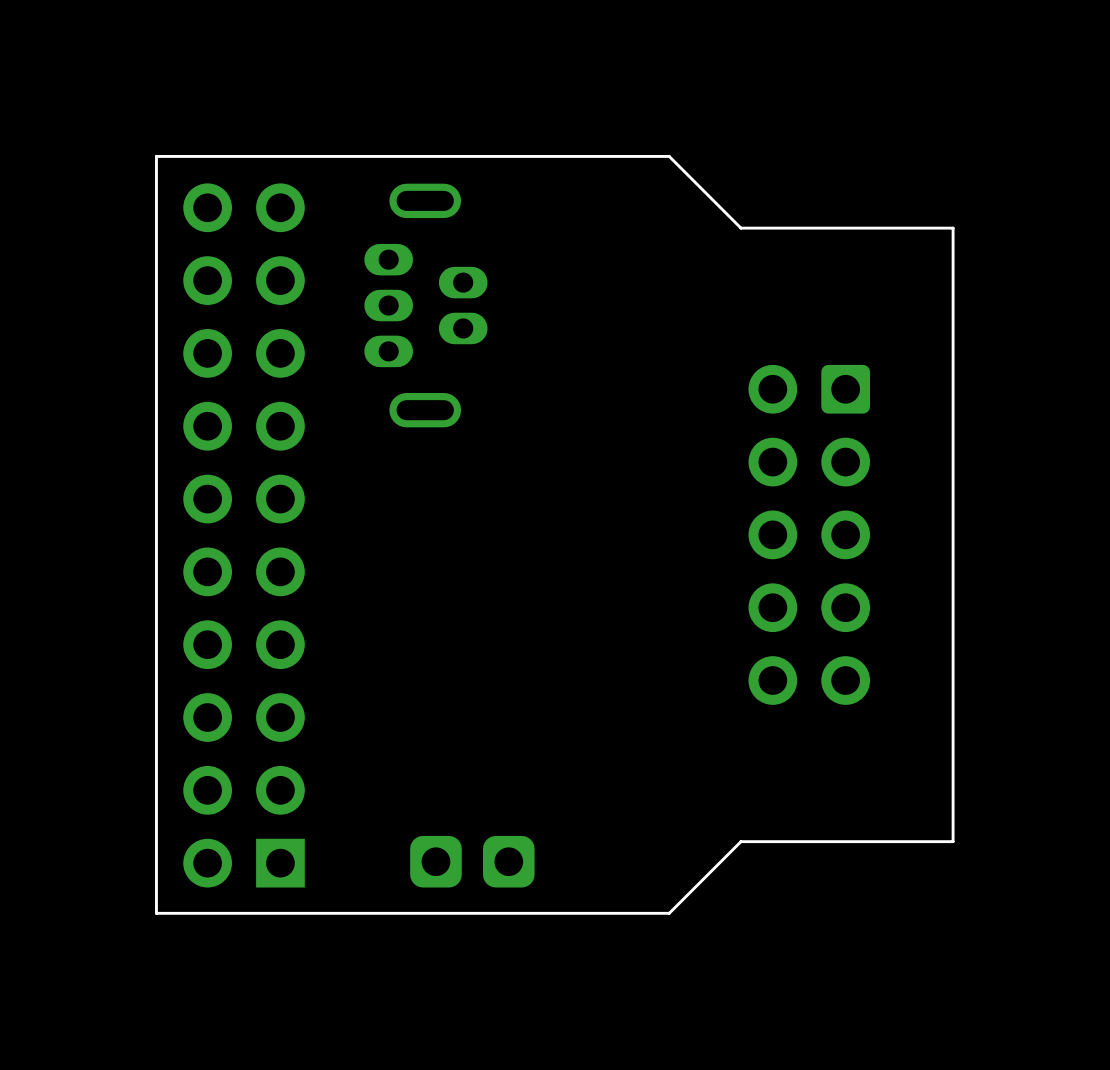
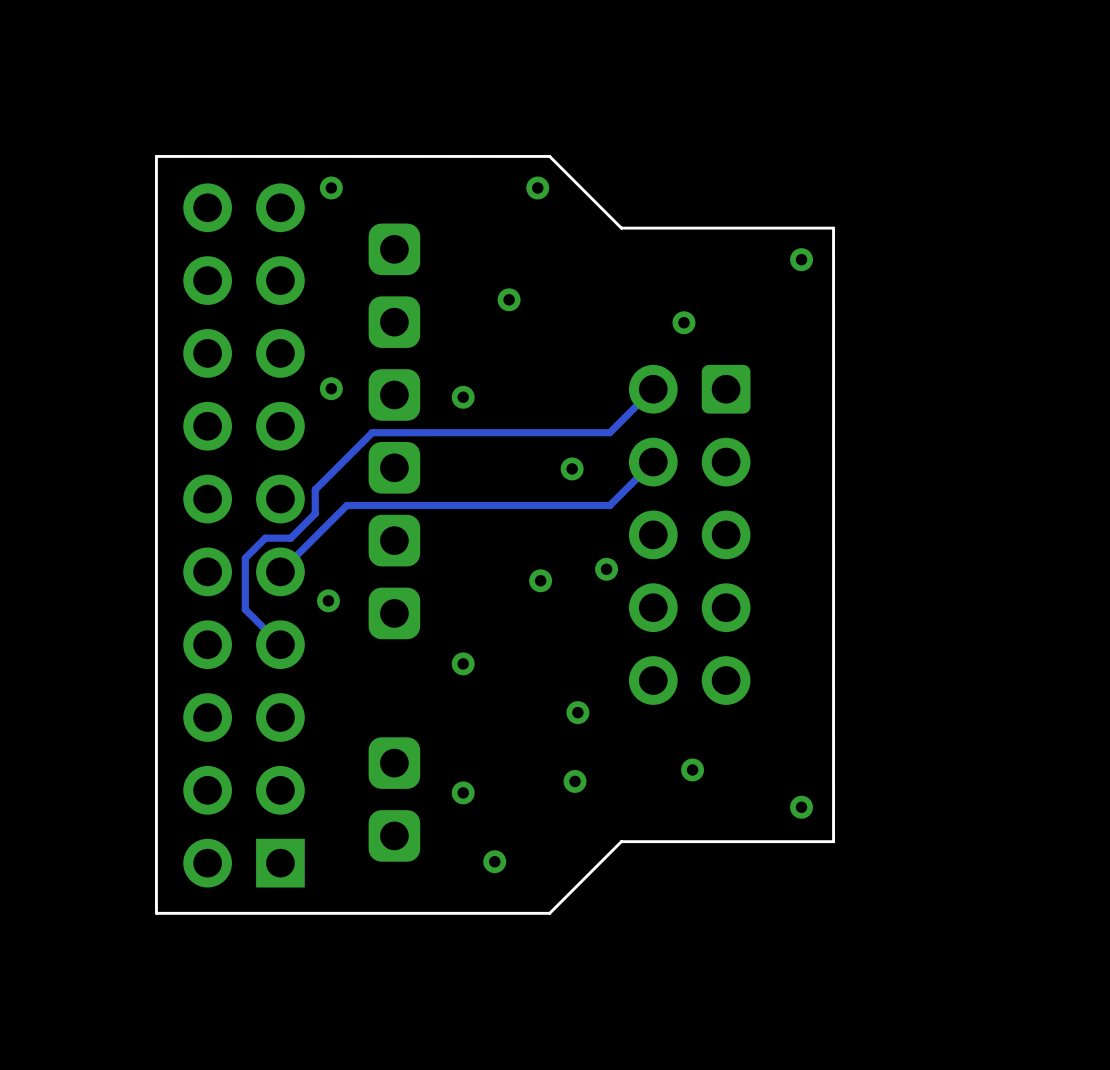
board edge: (549, 156) (669, 156) (740, 228) -> (549, 156) (621, 228) (740, 228)
via: none -> (331, 187)
via: none -> (537, 187)
board edge: (833, 228) (953, 228) (953, 841) (833, 841) -> (833, 228) (833, 841)
via: none -> (801, 259)
via: none -> (509, 299)
part: (425, 305) -> none
via: none -> (683, 322)
via: none -> (331, 388)
track: none -> (653, 389) (609, 432) (372, 432) (315, 489) (315, 513) (290, 538) (265, 538) (245, 558) (245, 609) (280, 644)
via: none -> (463, 397)
part: none -> (394, 431)
track: none -> (653, 462) (609, 505) (346, 505) (280, 571)
via: none -> (572, 468)
part position: (809, 534) -> (689, 534)
via: none -> (606, 569)
via: none -> (540, 580)
via: none -> (328, 600)
via: none -> (463, 663)
via: none -> (577, 712)
via: none -> (692, 769)
via: none -> (575, 781)
via: none -> (463, 792)
via: none -> (801, 807)
board edge: (740, 841) (669, 913) (549, 913) -> (740, 841) (621, 841) (549, 913)
part rotation: 0° (472, 861) -> 90° clockwise (394, 799)
part position: (472, 861) -> (394, 799)
via: none -> (494, 861)

